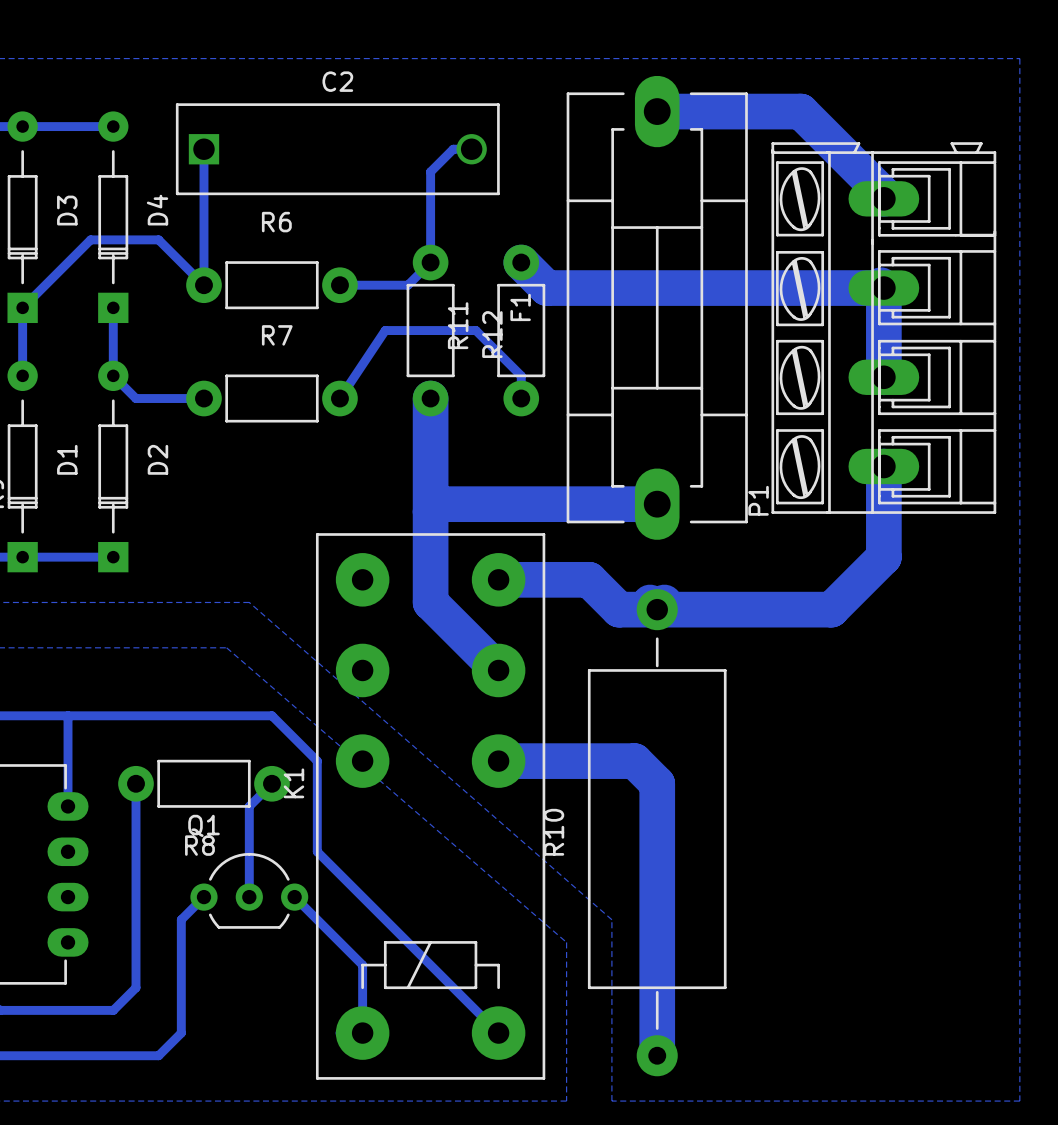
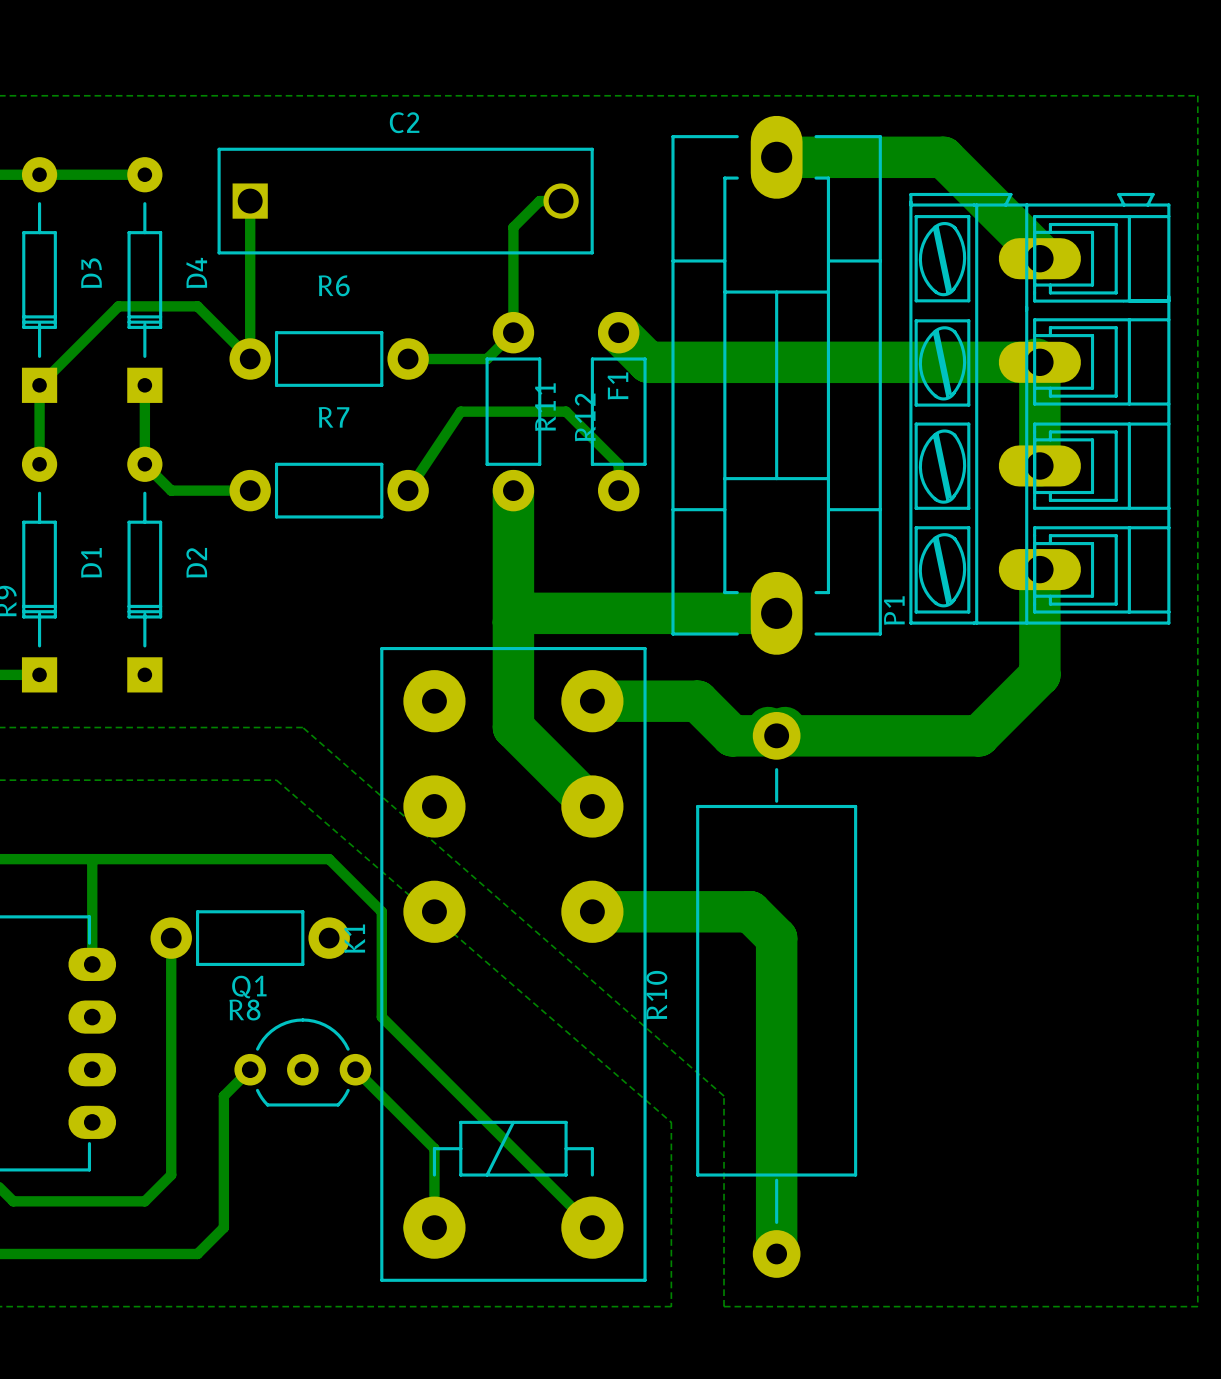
bottom track: (22, 557) (113, 557) -> none
bottom track: (271, 783) (249, 806) (249, 897) -> none

